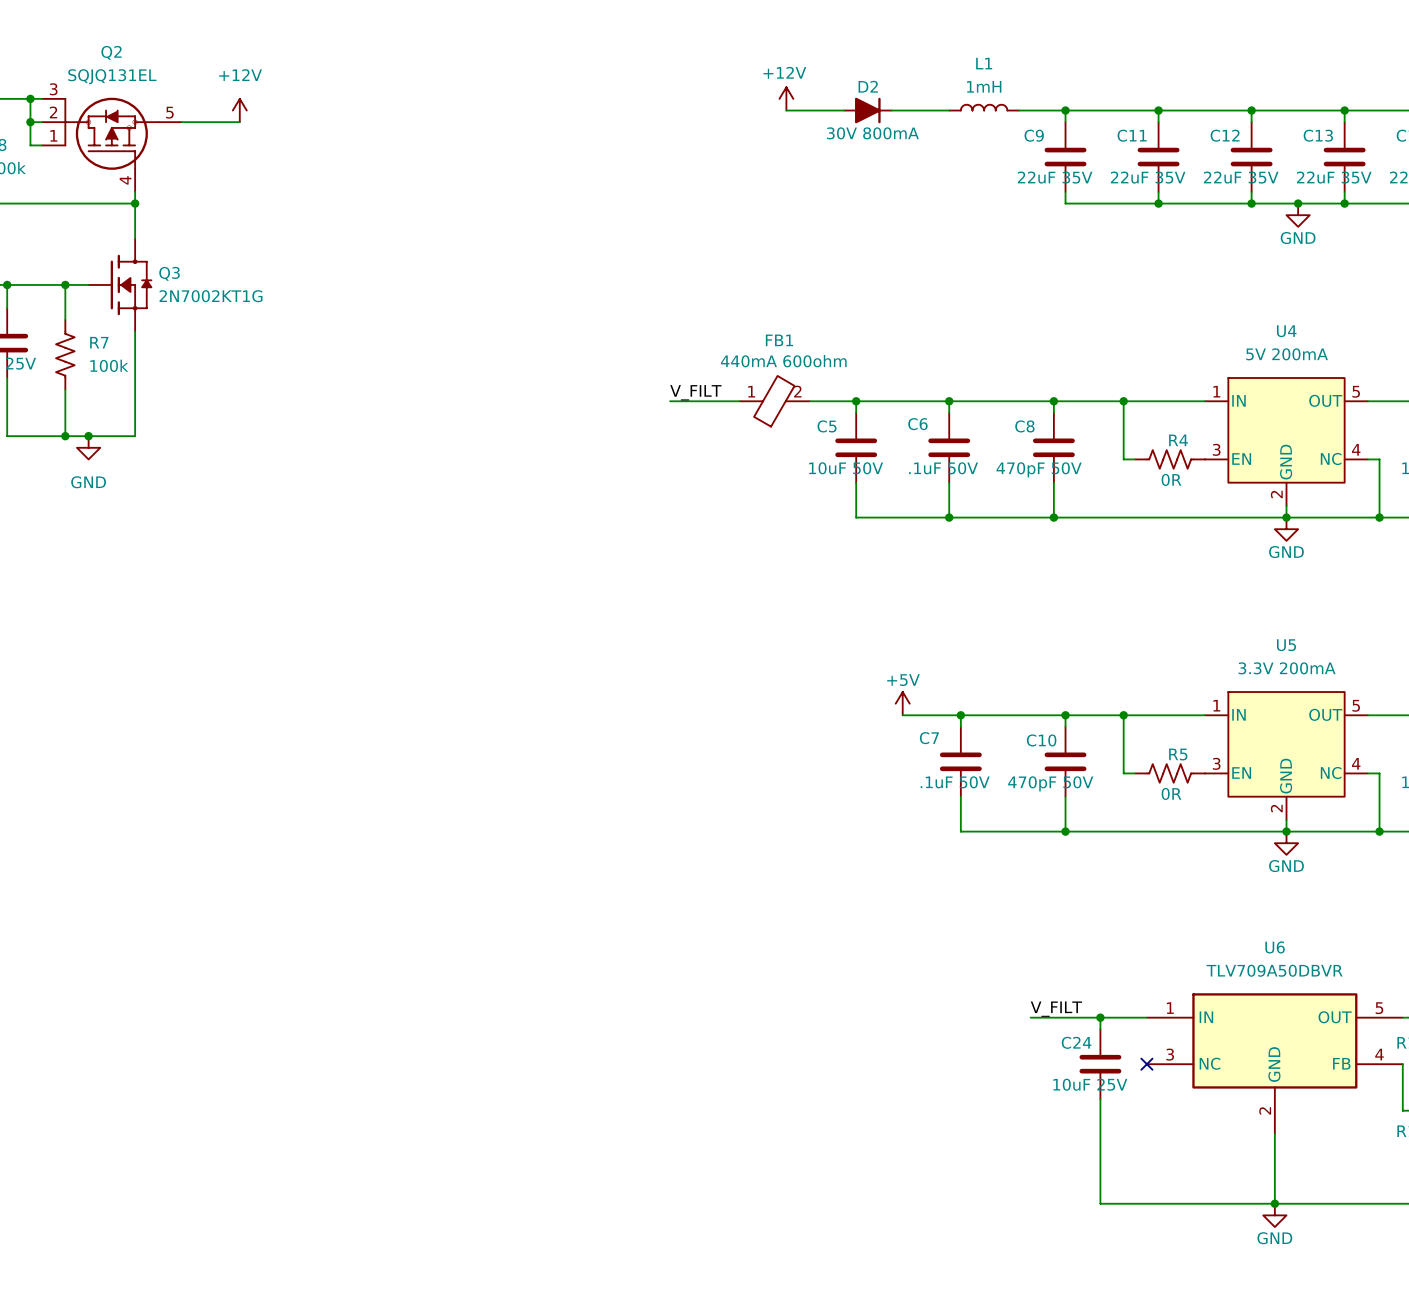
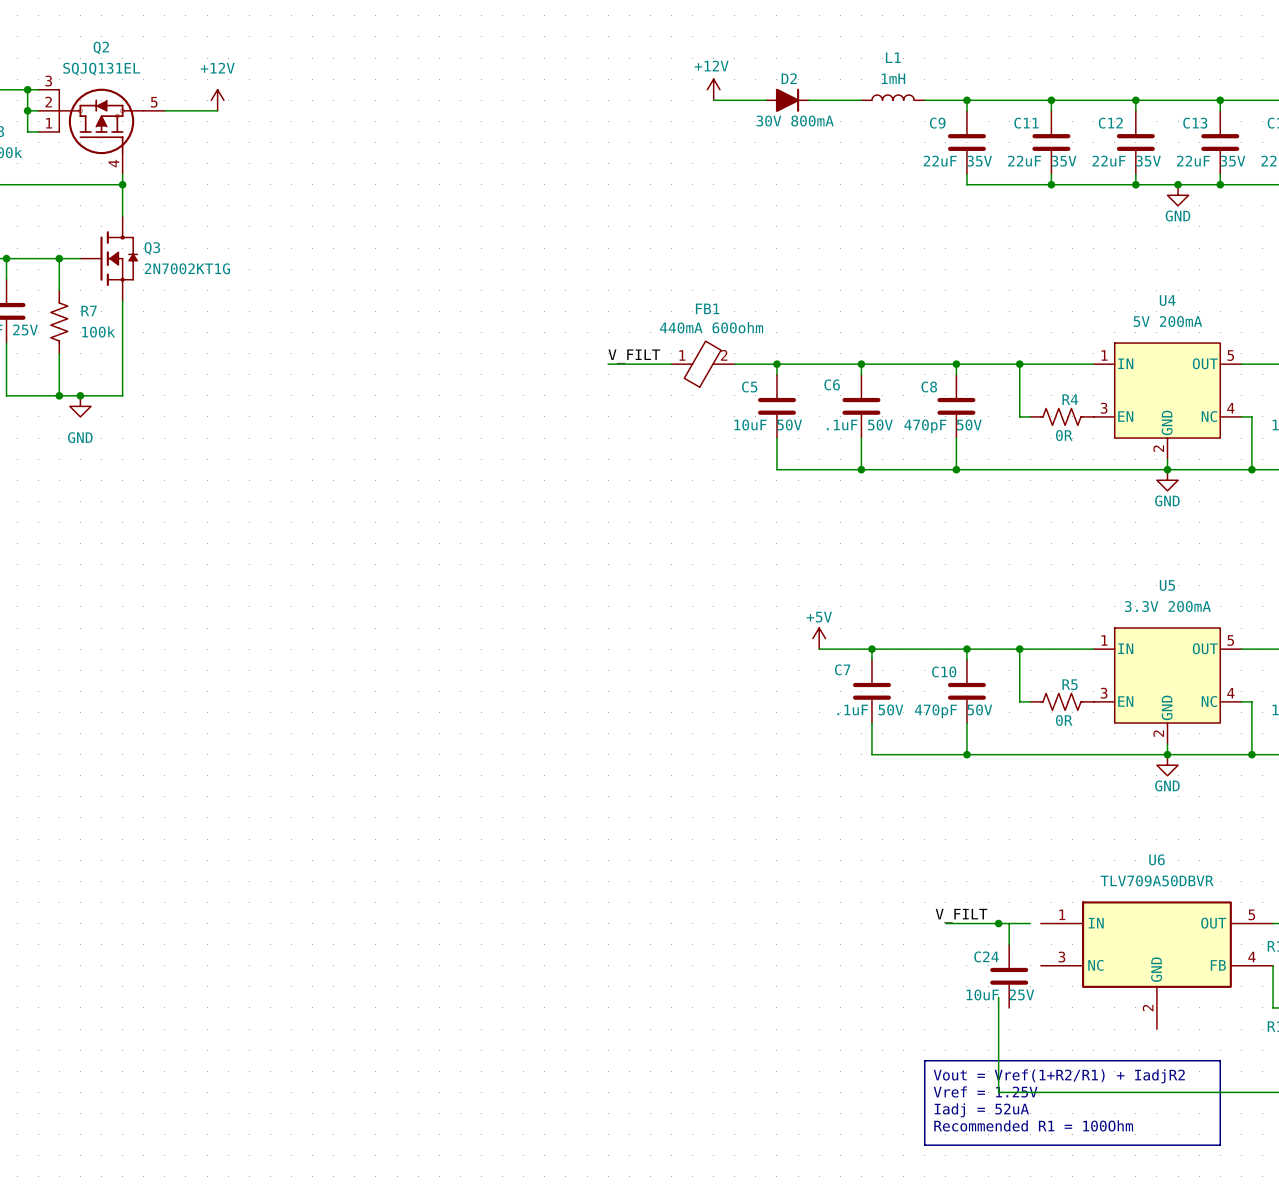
wire: (1030, 1017) (1042, 1017) -> none
wire: (1100, 1017) (1100, 1029) -> none
wire: none -> (1009, 923) (1009, 944)
wire: (1135, 1017) (1146, 1017) -> none
C24 position: (1100, 1064) -> (1009, 976)
no-connect mark: (1146, 1064) -> none
wire: (1274, 1133) (1274, 1203) -> none
line: none -> (924, 1060) (1220, 1060) (1220, 1145) (924, 1145) (924, 1060)
text: none -> Vout = Vref(1+R2/R1) + IadjR2 (1059, 1076)
text: none -> Vref = 1.25V (985, 1091)
junction: (1274, 1203) -> none
power symbol: GND (1274, 1215) -> none
text: none -> Iadj = 52uA (981, 1110)
text: none -> Recommended R1 = 100Ohm (1033, 1125)

